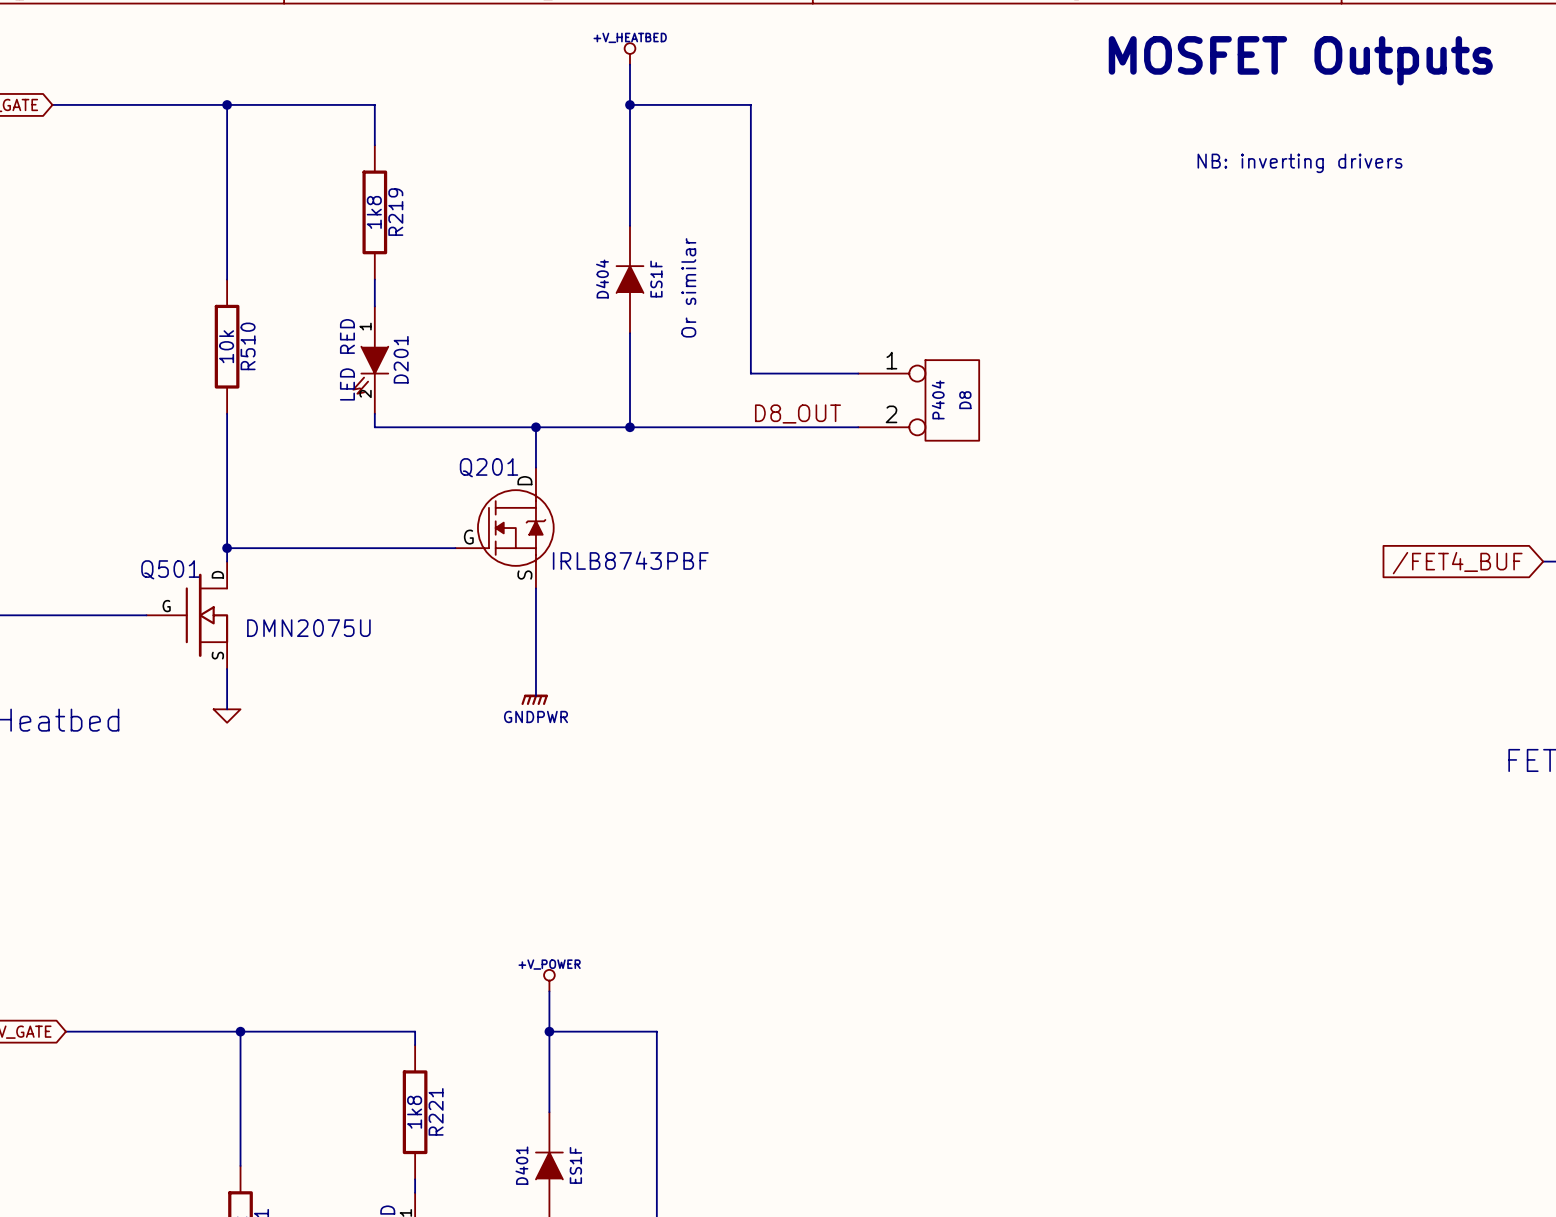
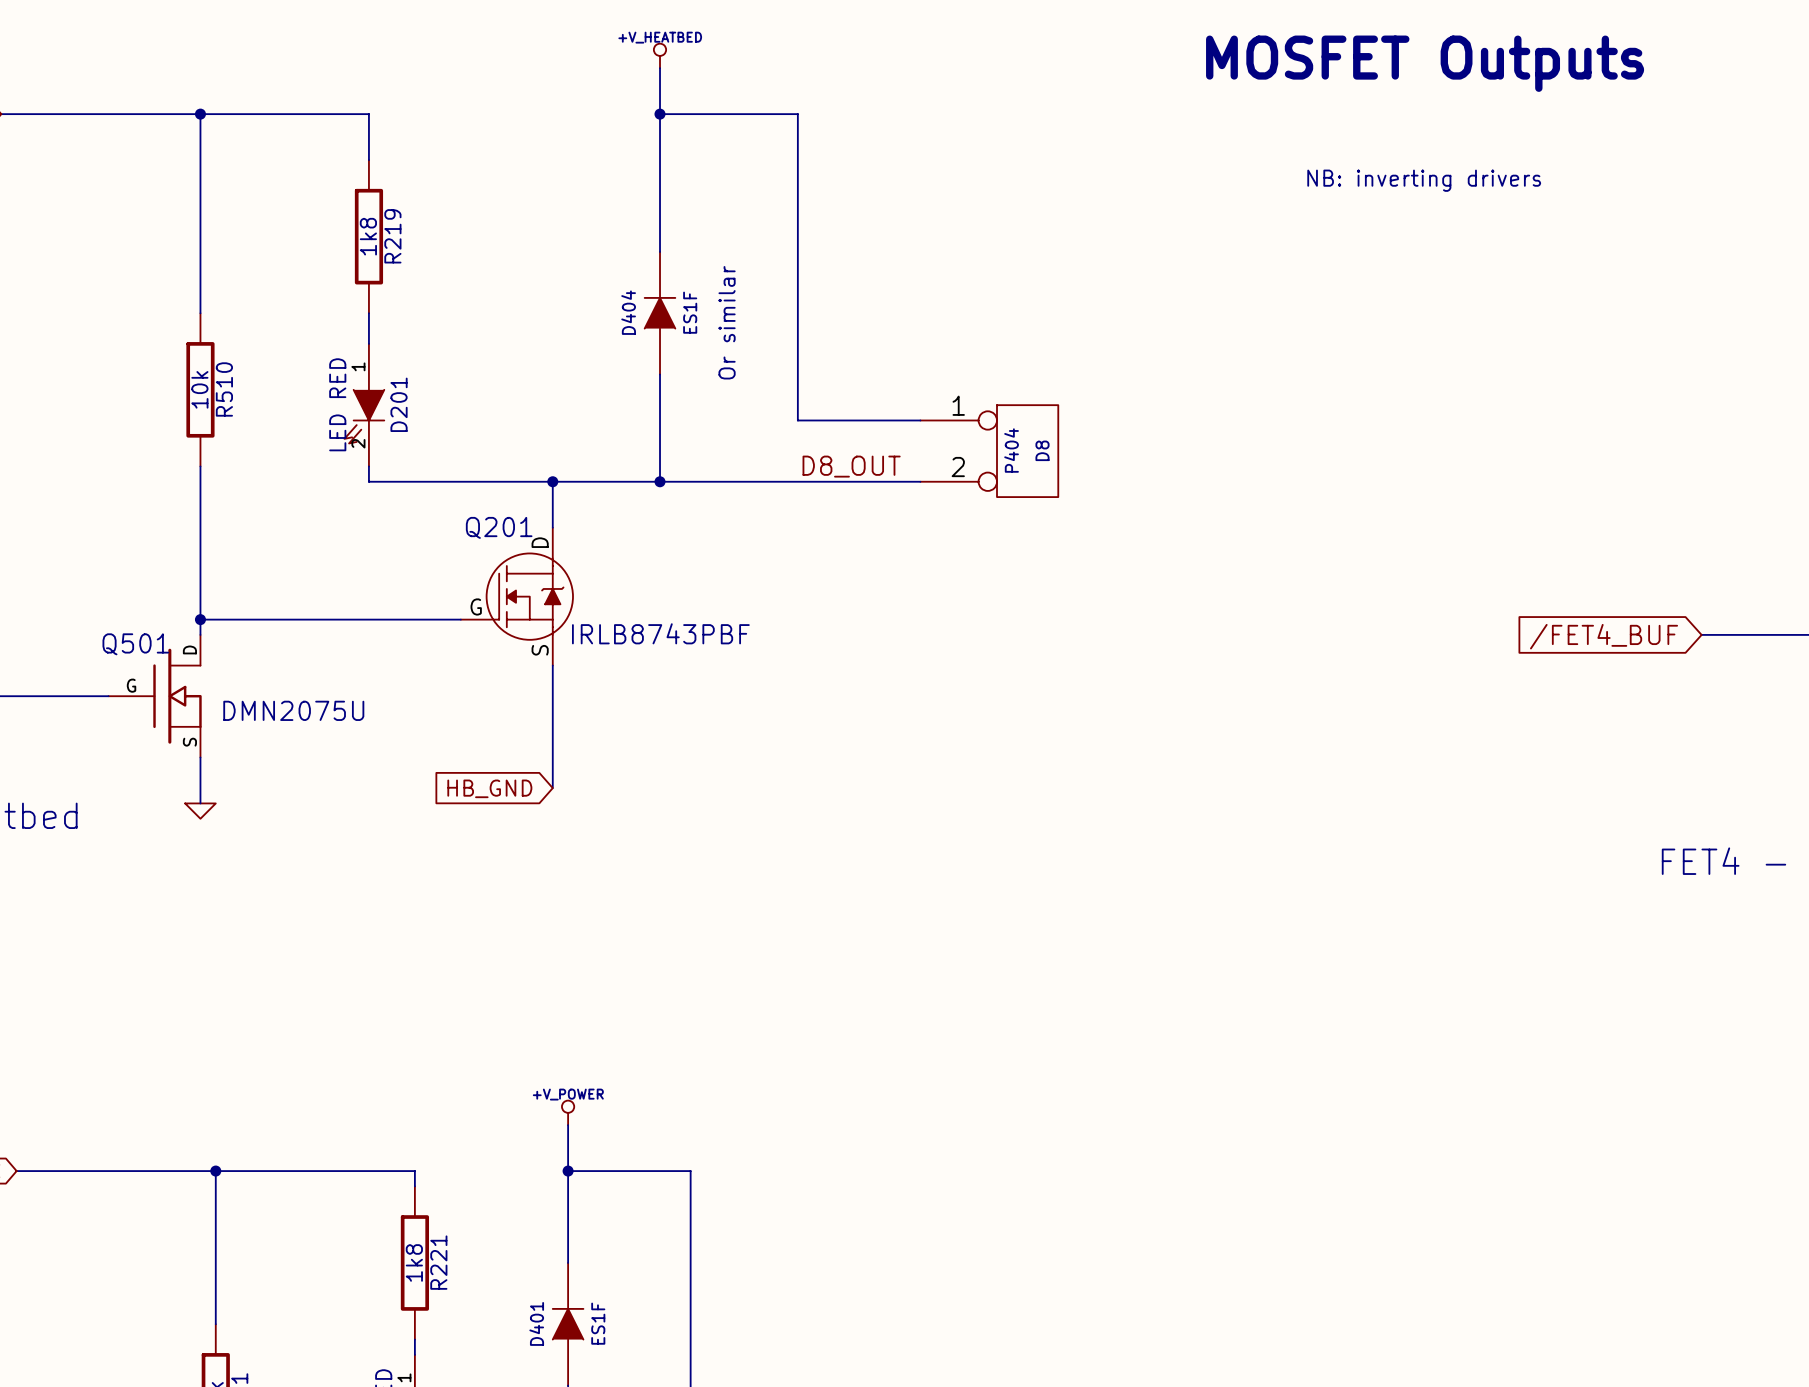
global label: none -> HB_GND (489, 788)
power symbol: GNDPWR (534, 699) -> none

